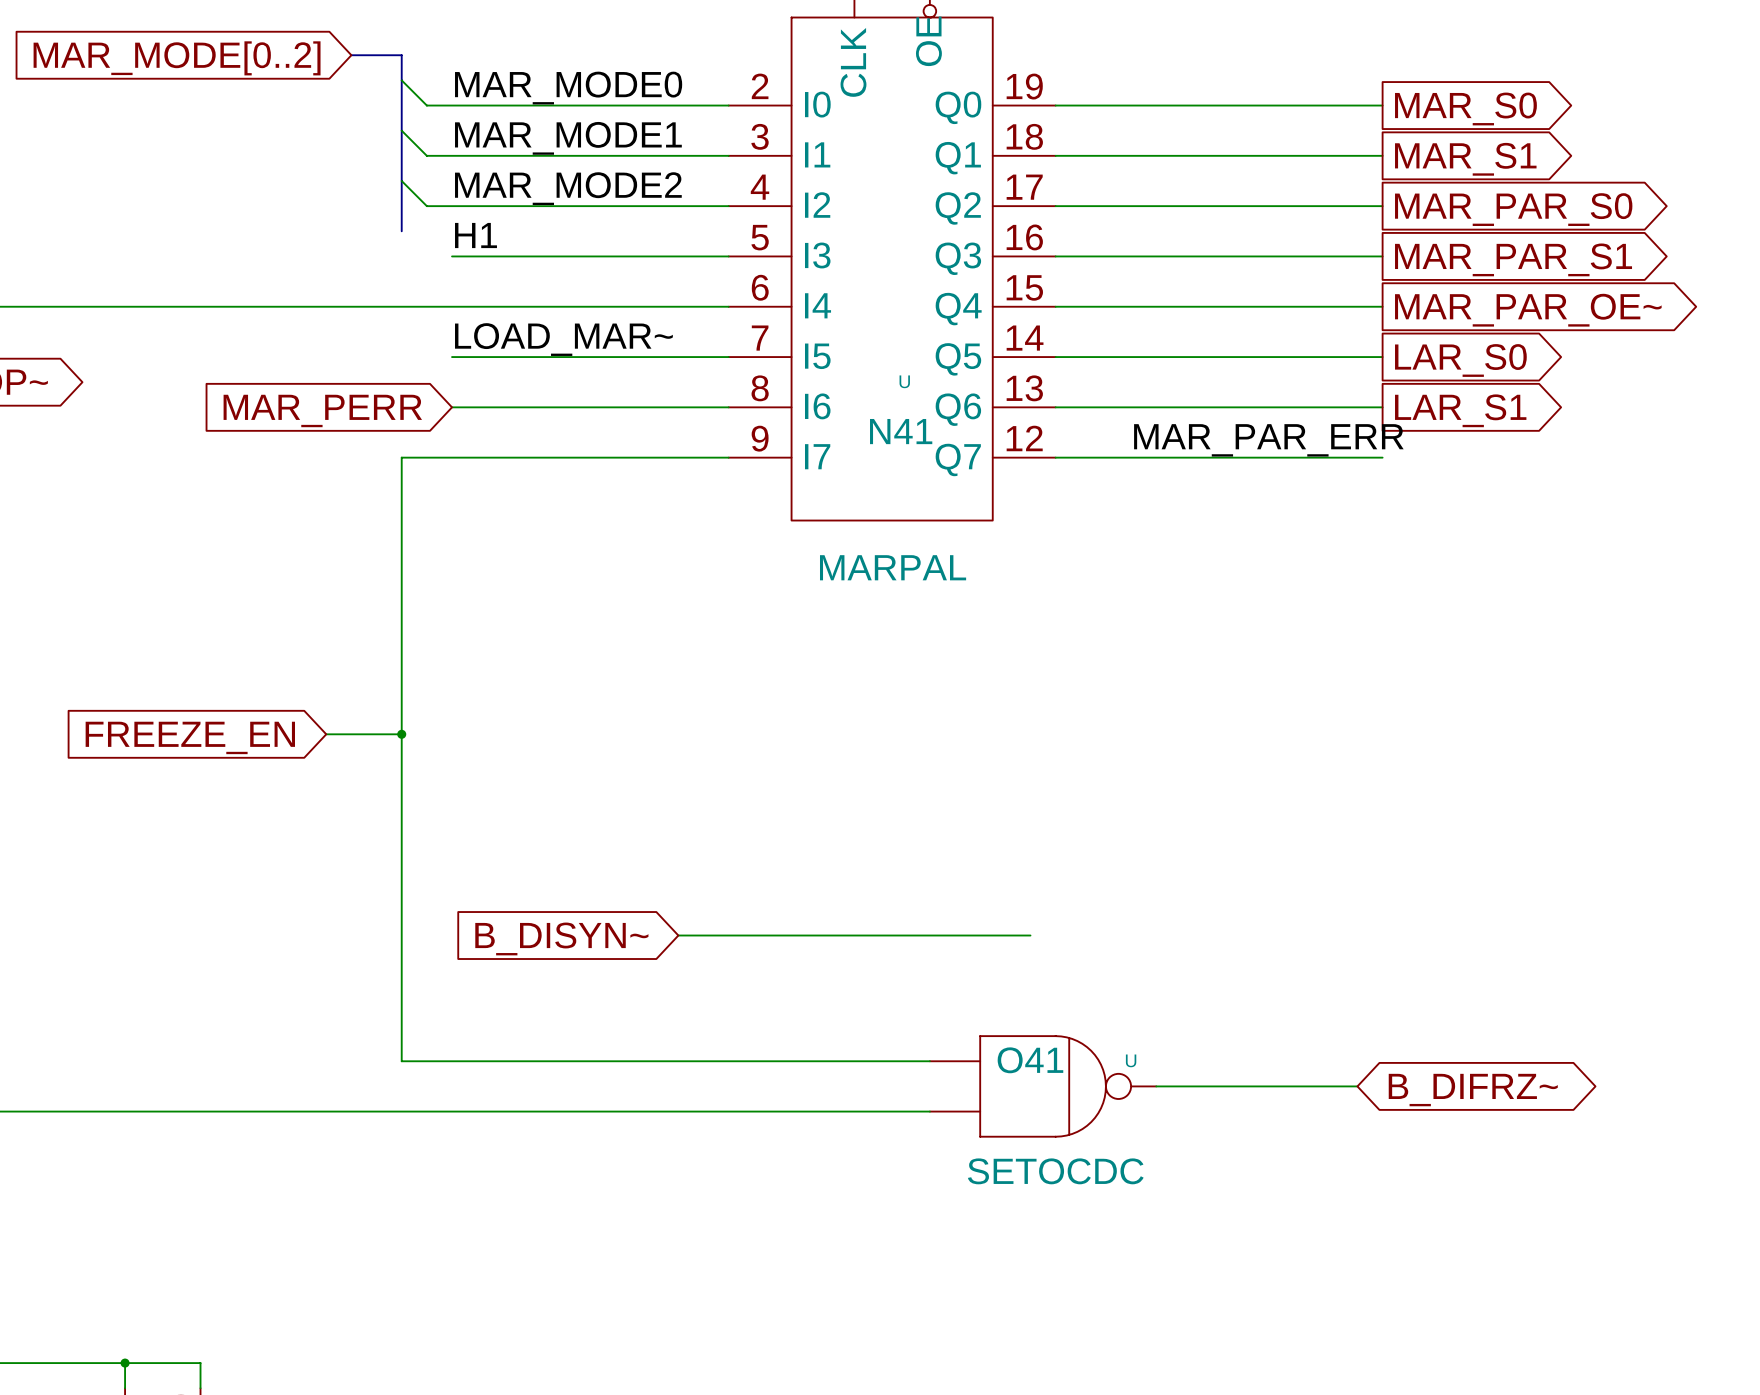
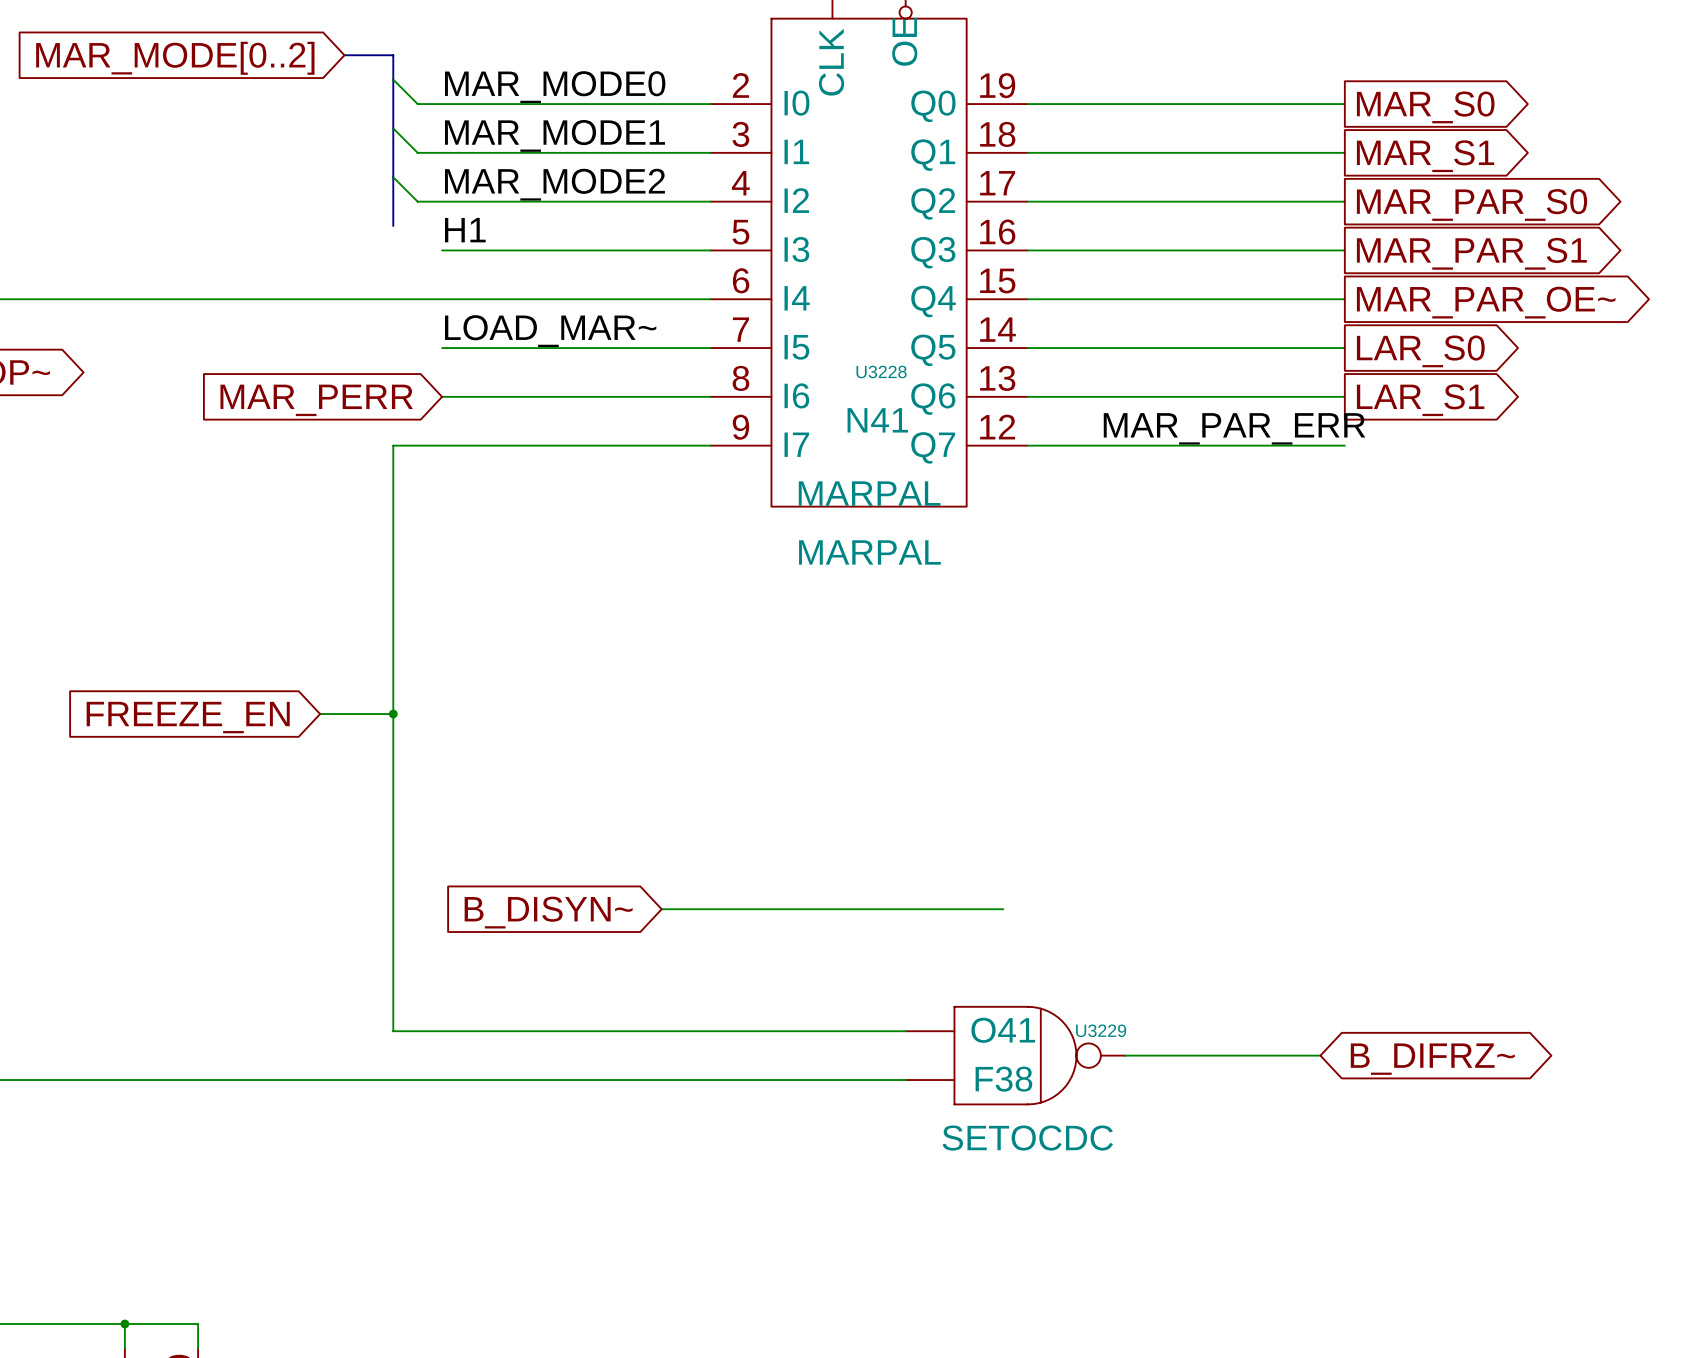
U name: U (904, 381) -> U3228 (881, 371)
U value: none -> MARPAL (869, 493)
U name: U (1131, 1060) -> U3229 (1101, 1030)
U value: none -> F38 (1003, 1079)

